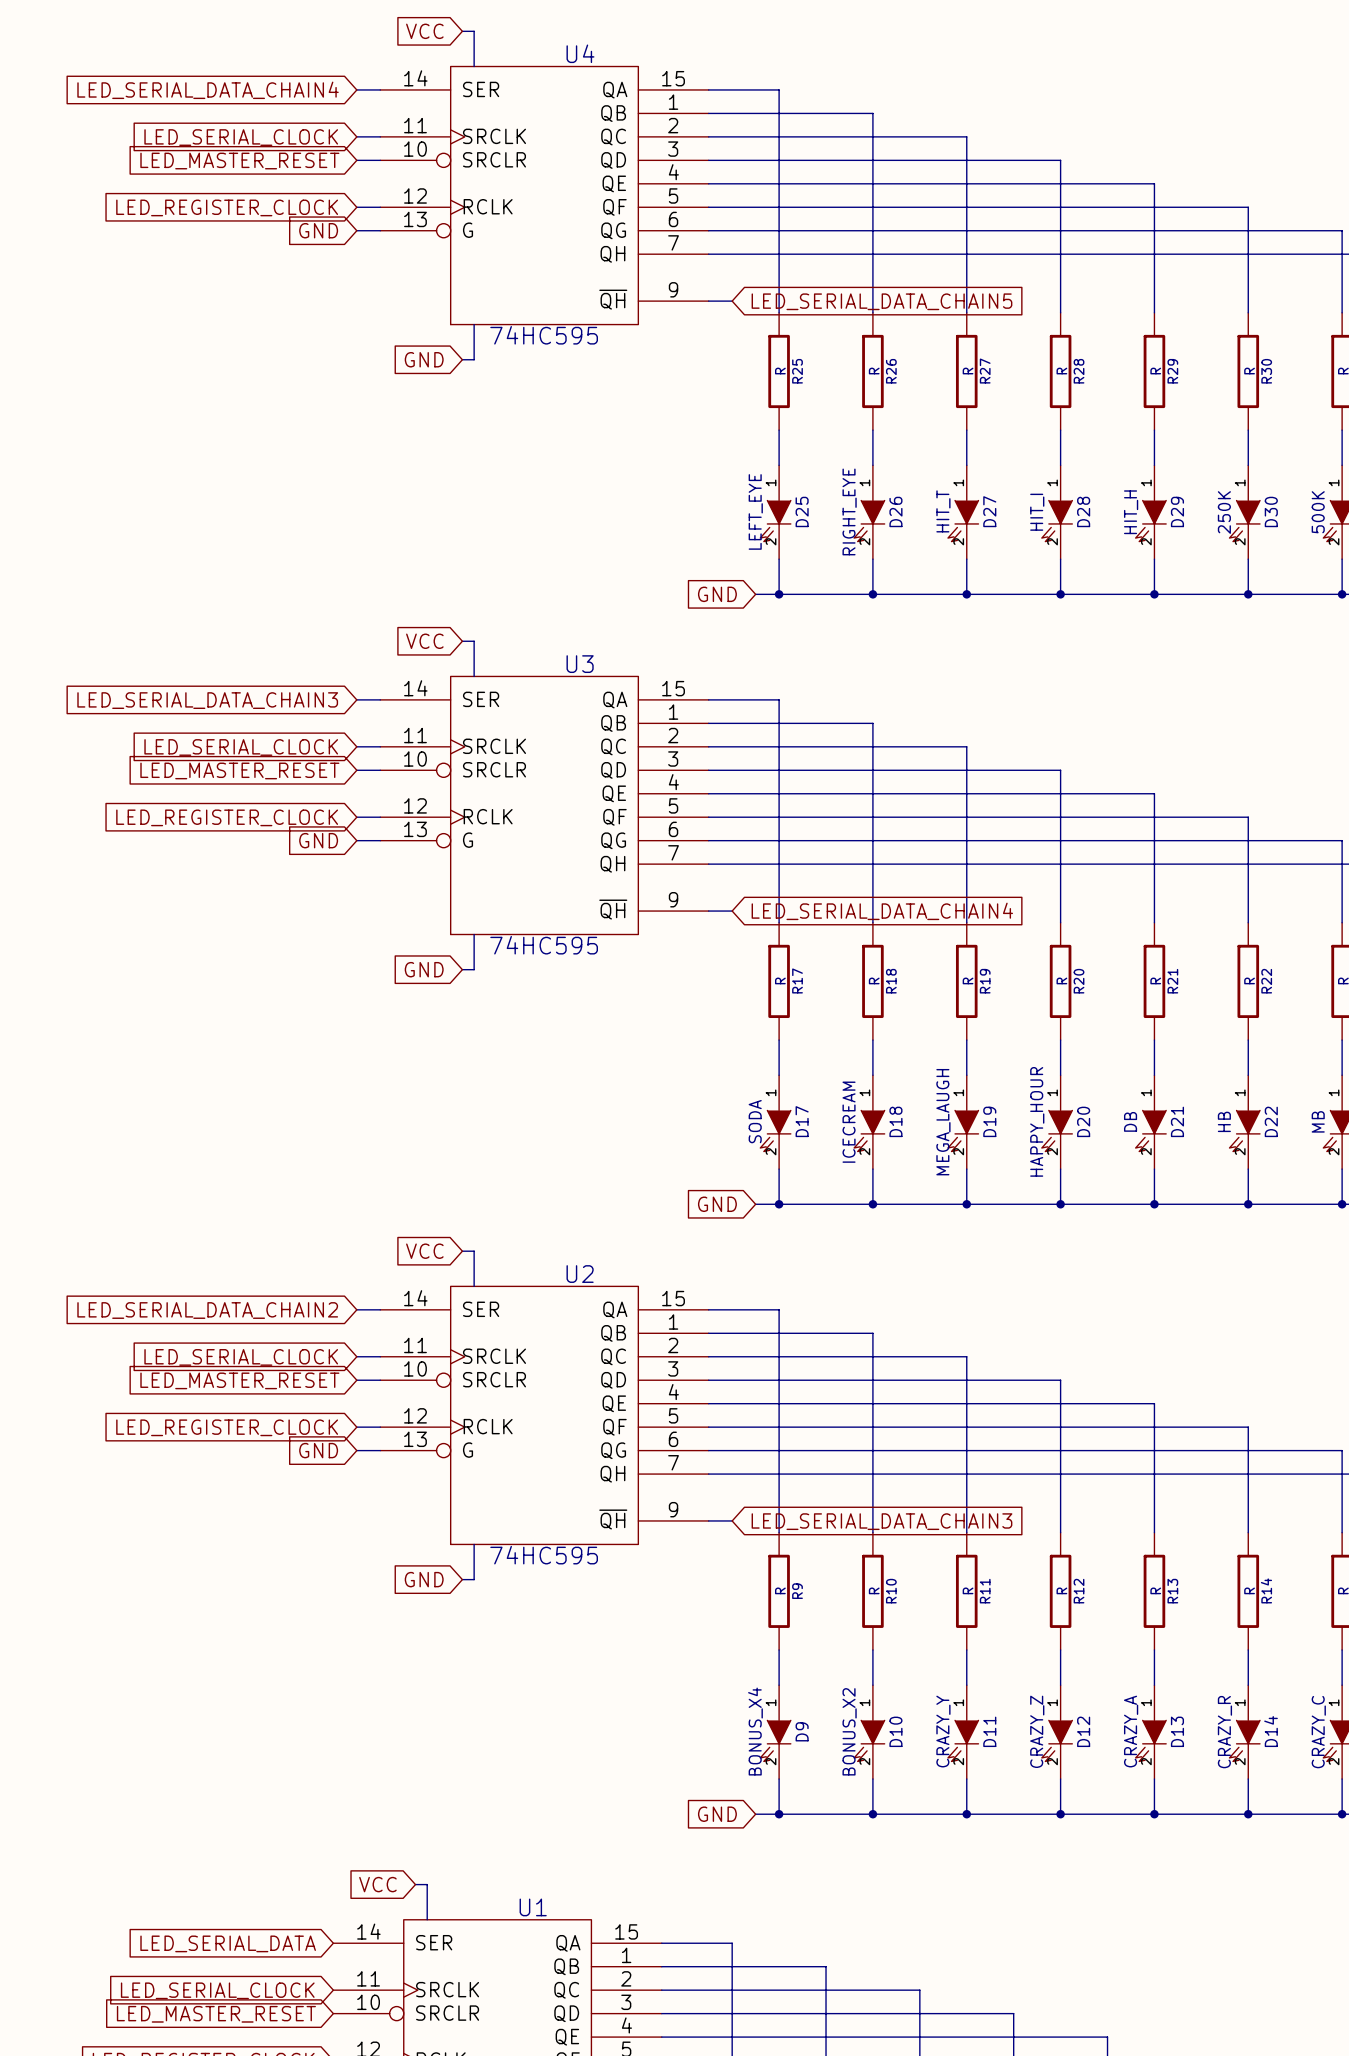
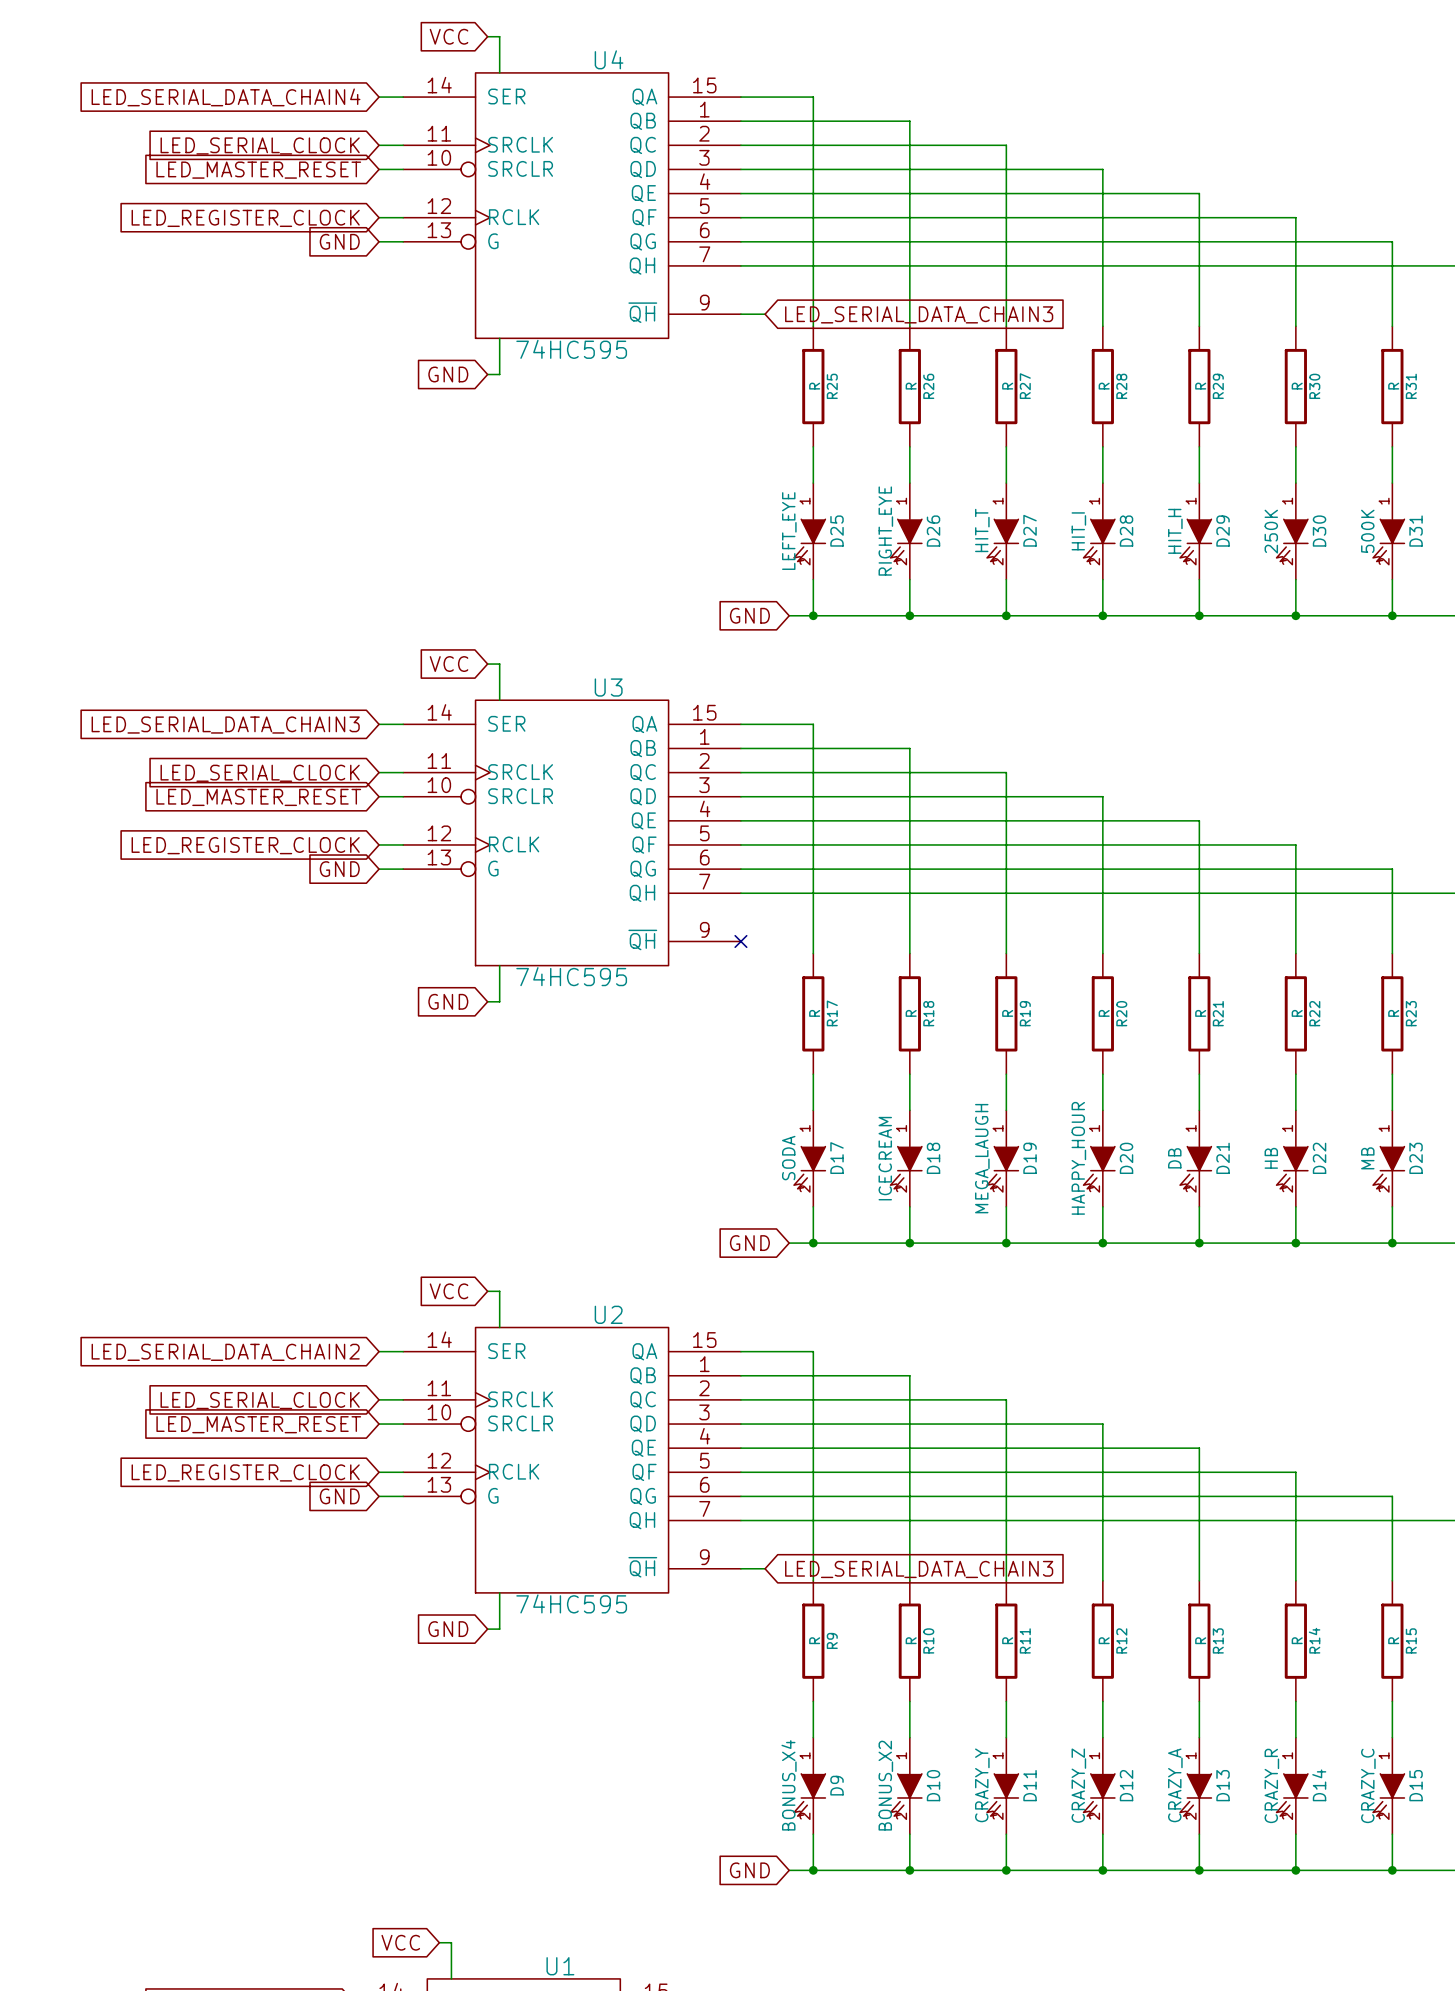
global label: LED_SERIAL_DATA_CHAIN5 (881, 301) -> LED_SERIAL_DATA_CHAIN3 (919, 314)
wire: (708, 911) (732, 911) -> none
no-connect mark: none -> (740, 941)
global label: LED_SERIAL_DATA_CHAIN4 (882, 911) -> none

